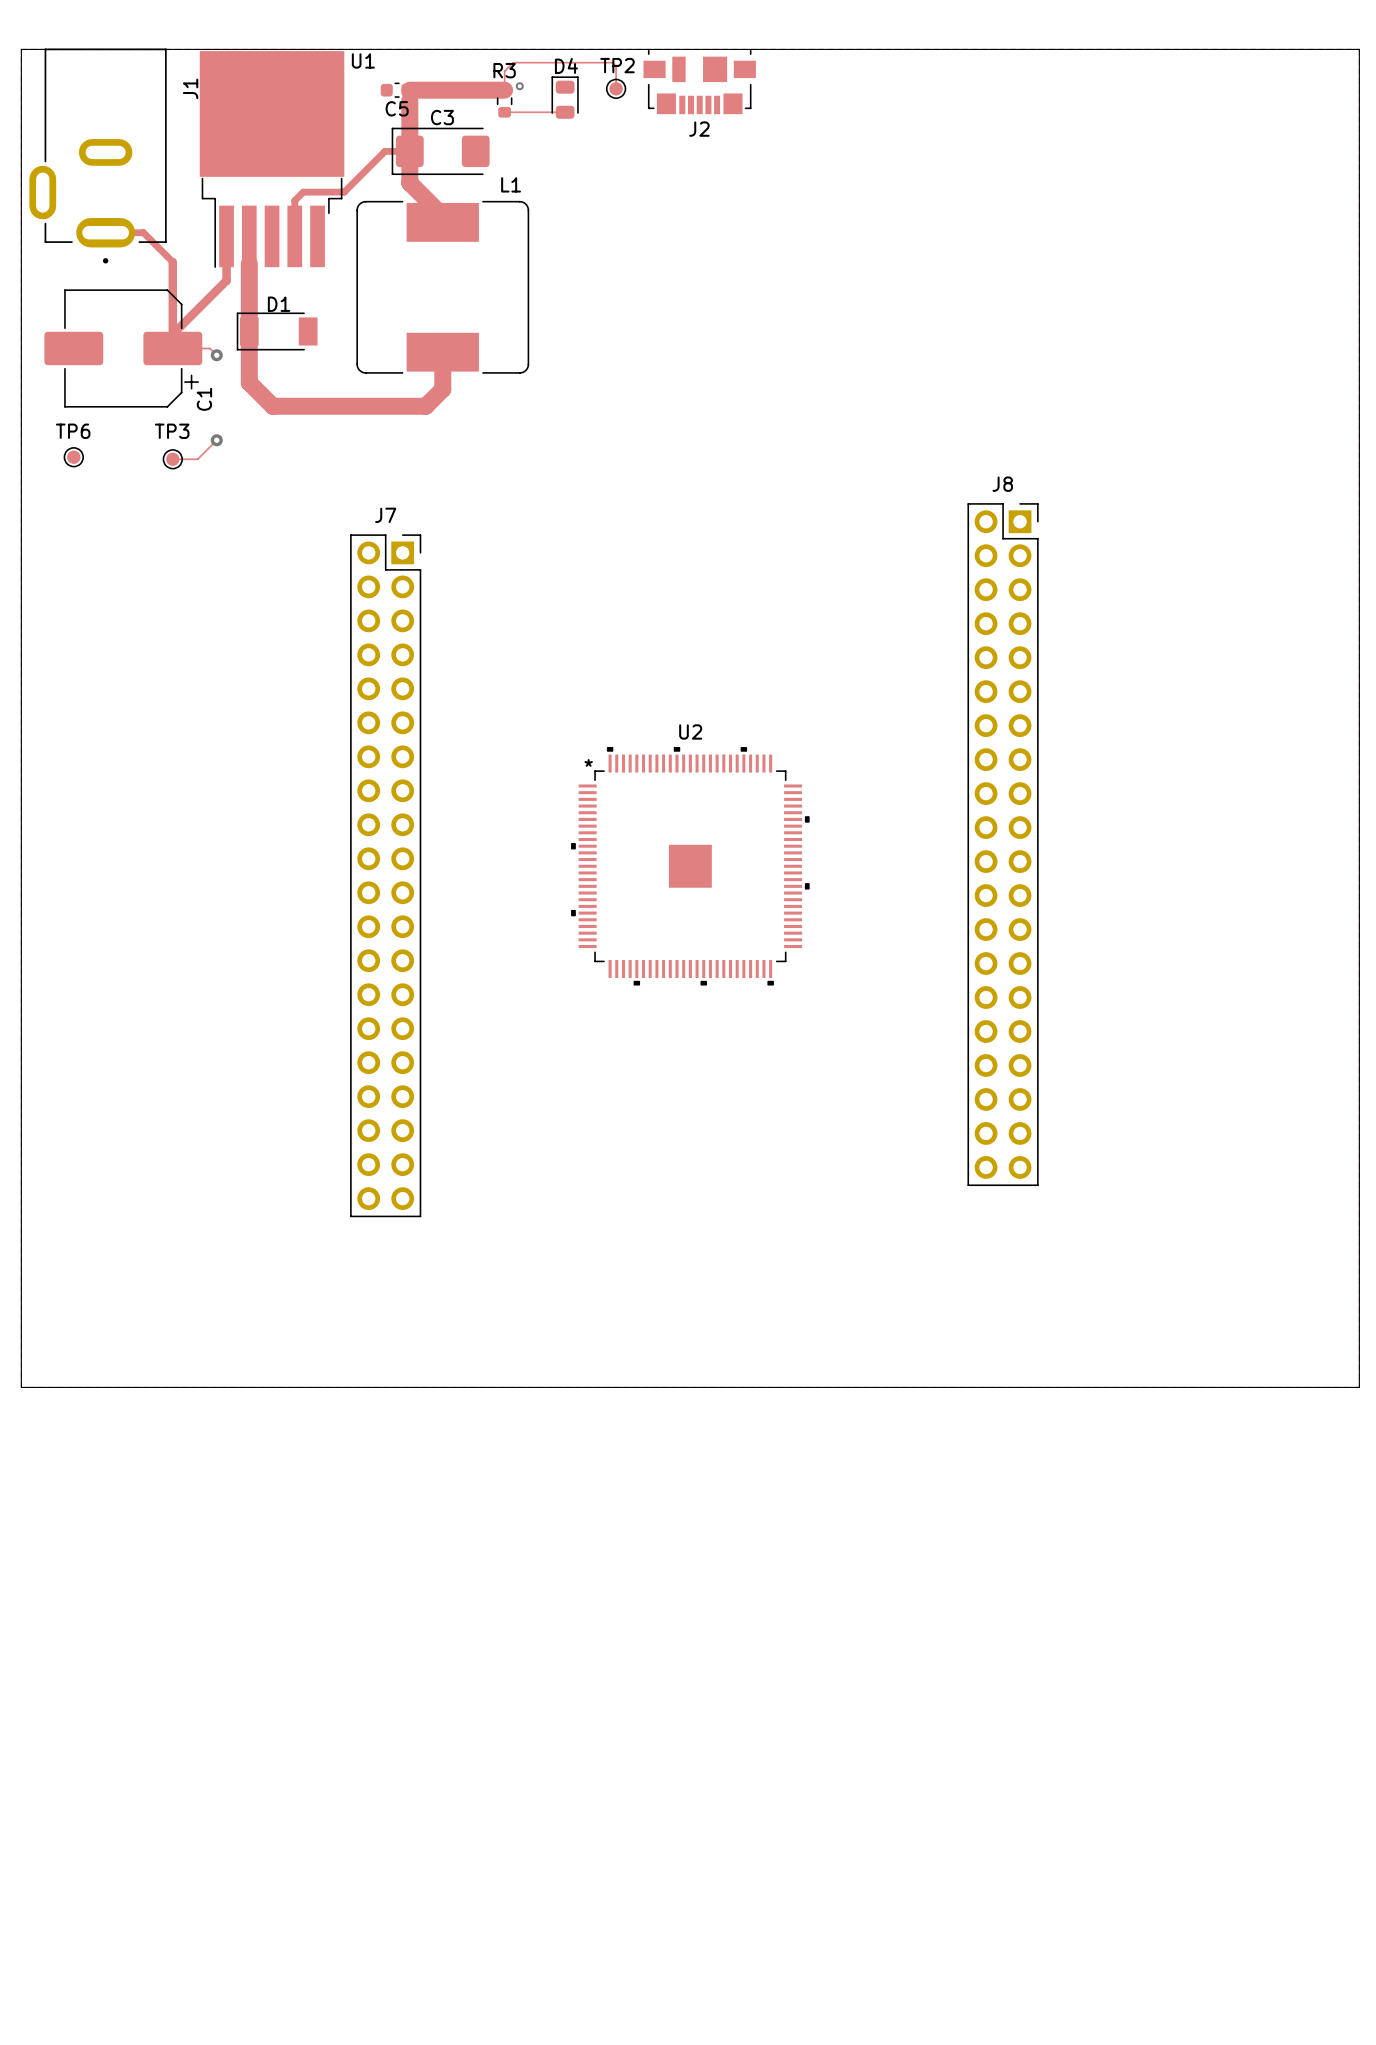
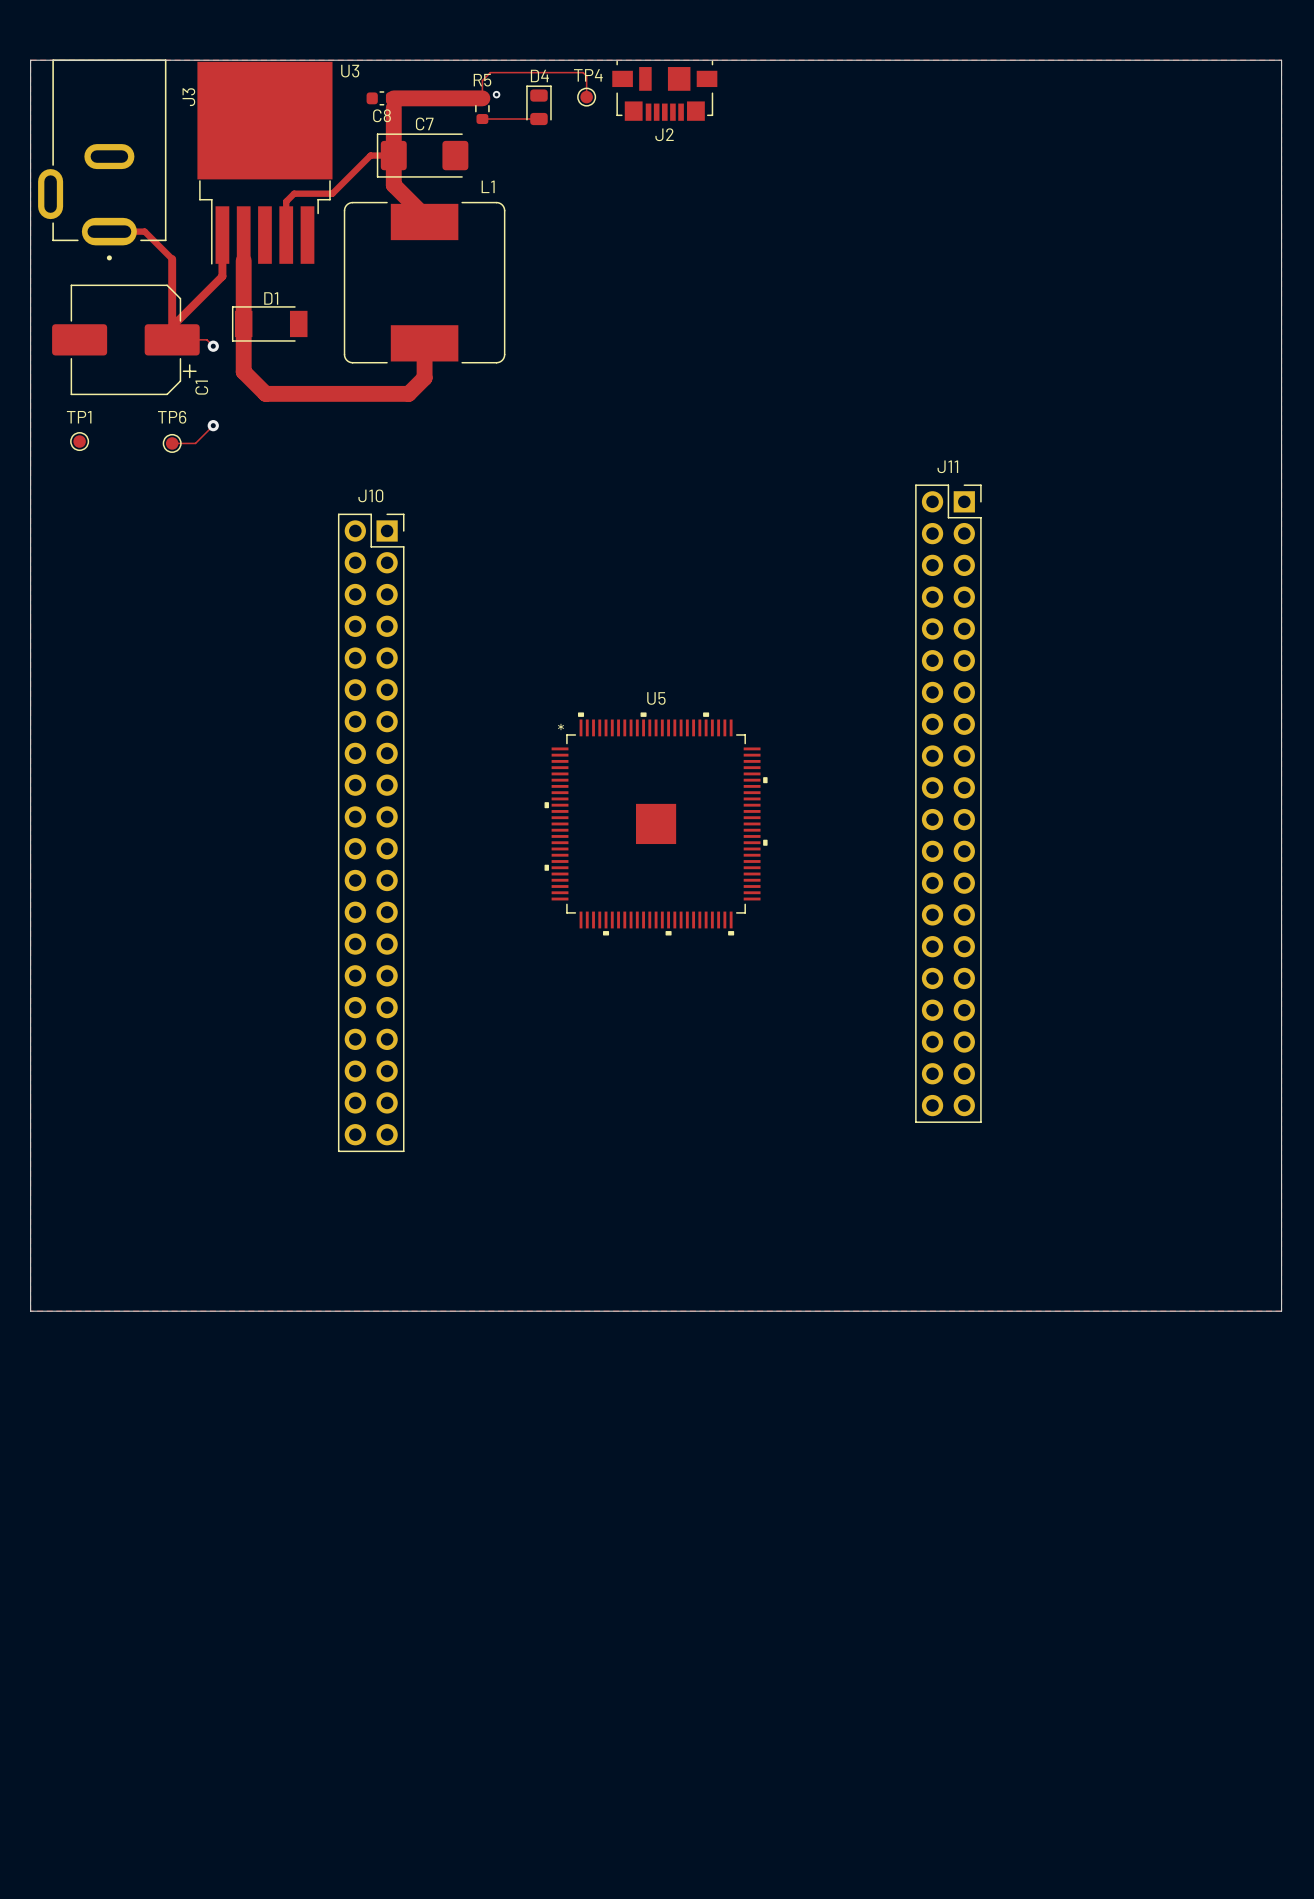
U1 name: U1 (363, 60) -> U3 (350, 71)
TP2 name: TP2 (617, 65) -> TP4 (588, 75)
R3 name: R3 (504, 70) -> R5 (482, 80)
J1 name: J1 (190, 88) -> J3 (188, 97)
C5 name: C5 (397, 108) -> C8 (381, 115)
C3 name: C3 (442, 117) -> C7 (424, 123)
TP6 name: TP6 (73, 431) -> TP1 (79, 417)
TP3 name: TP3 (172, 431) -> TP6 (172, 417)
J8 name: J8 (1002, 484) -> J11 (947, 466)
J7 name: J7 (385, 515) -> J10 (370, 495)
U2 name: U2 (690, 731) -> U5 (656, 698)

